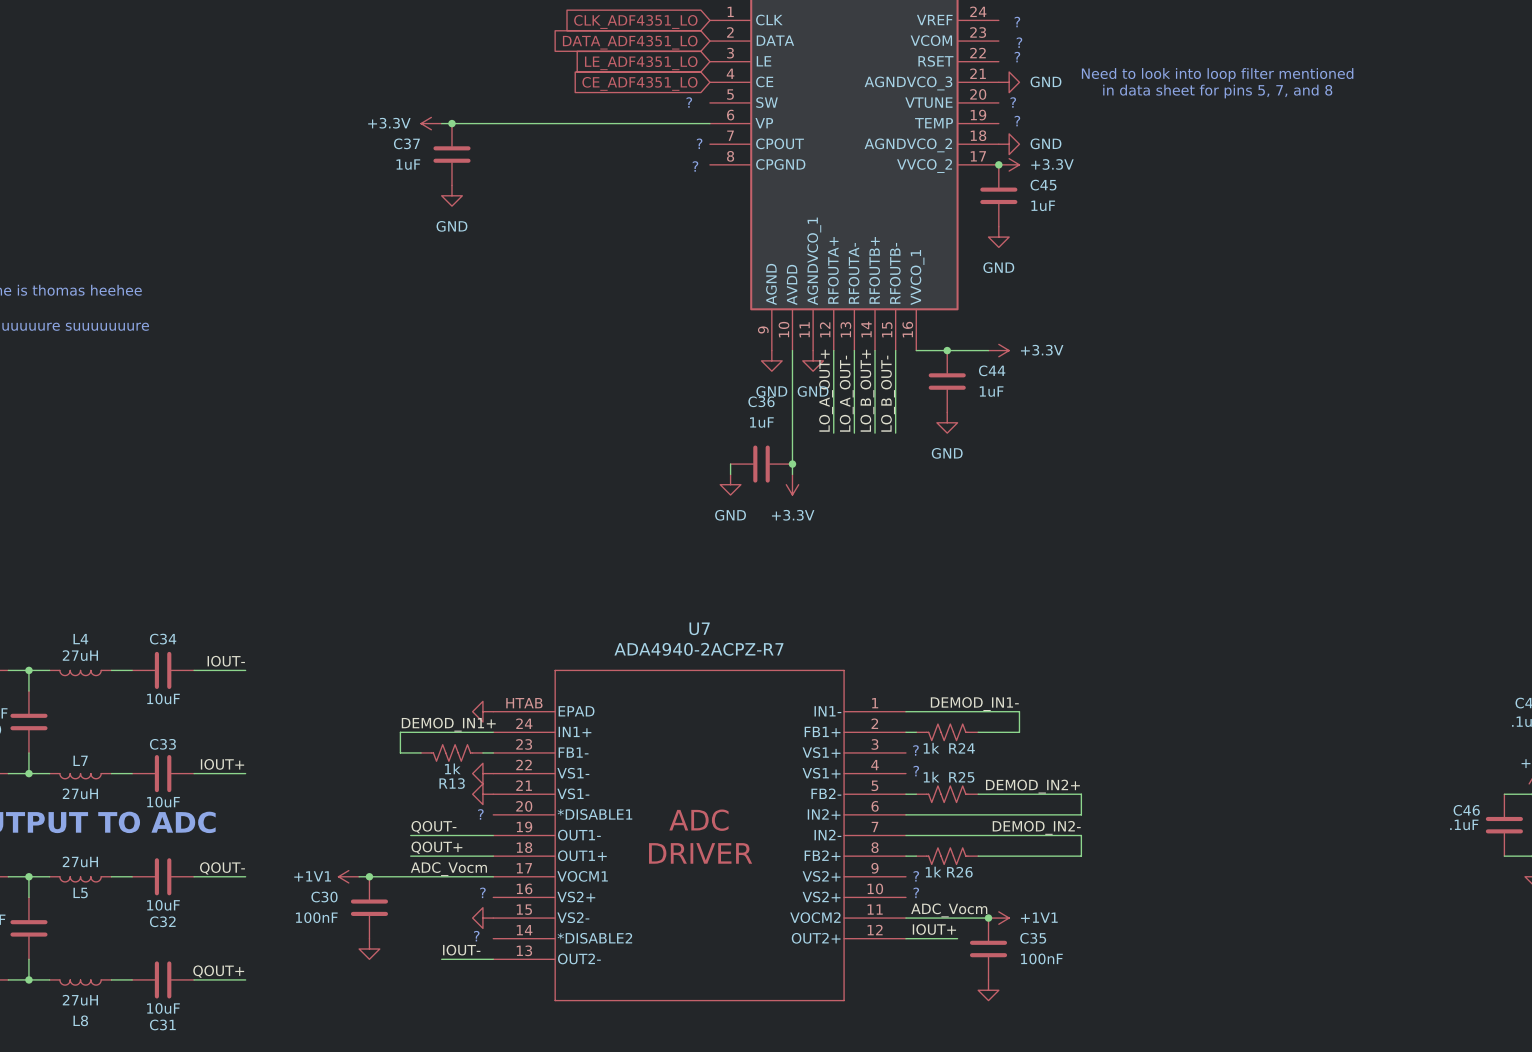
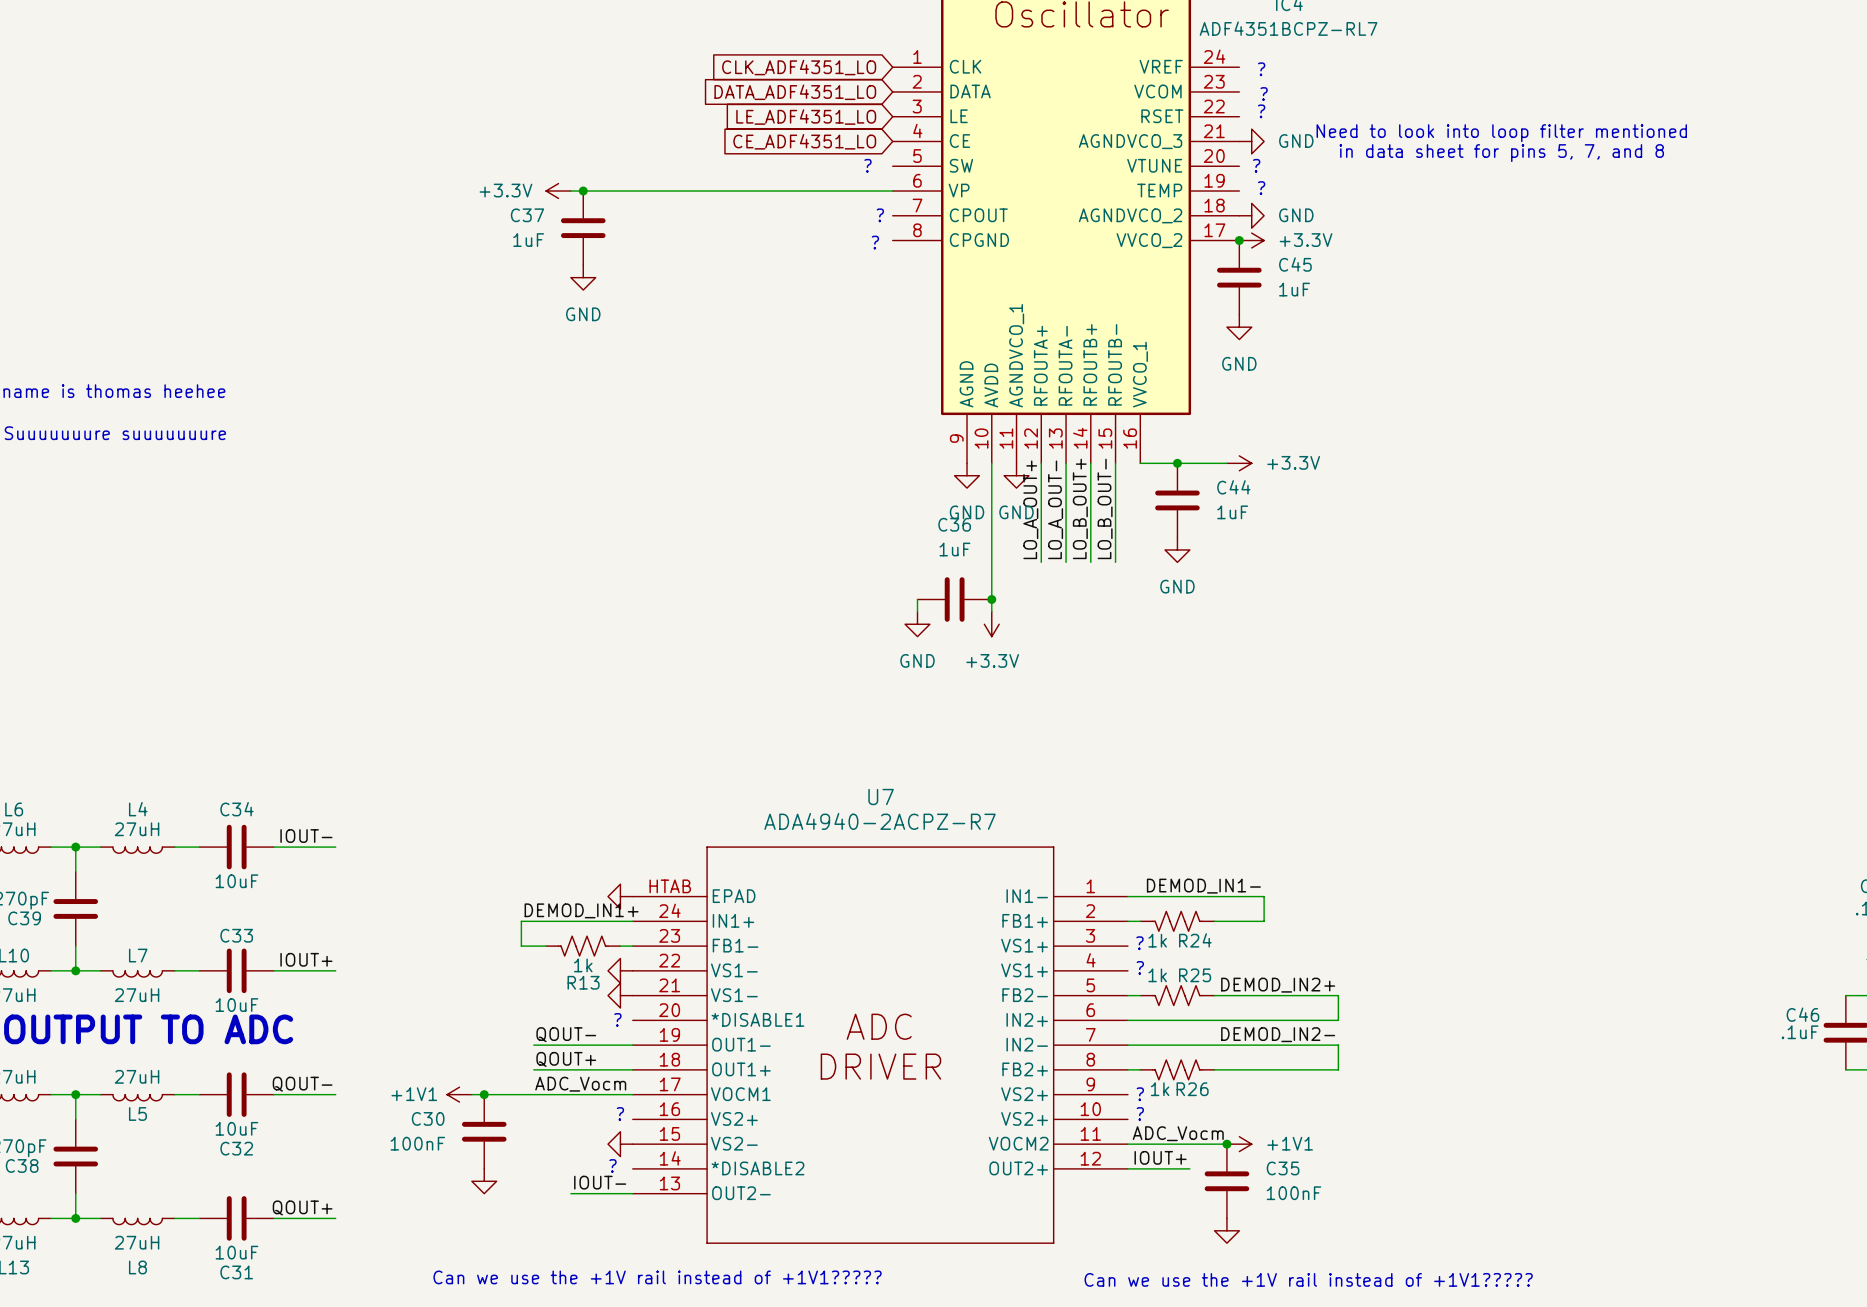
text: none -> Can we use the +1V rail instead of +1V1????? (657, 1277)
text: none -> Can we use the +1V rail instead of +1V1????? (1308, 1279)

